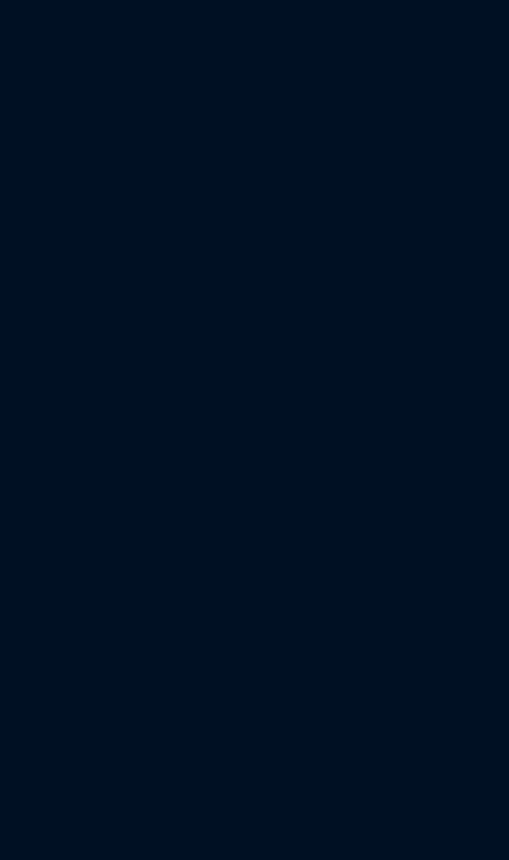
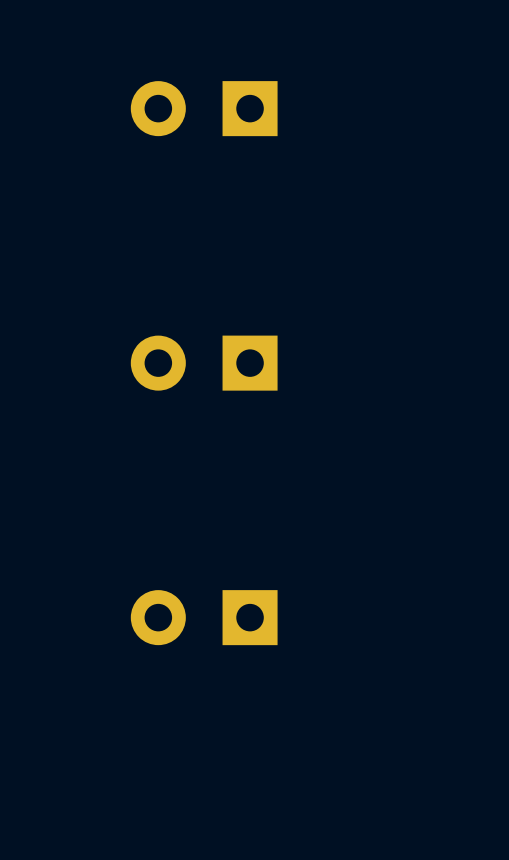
part: none -> (204, 108)
part: none -> (204, 363)
part: none -> (204, 617)

